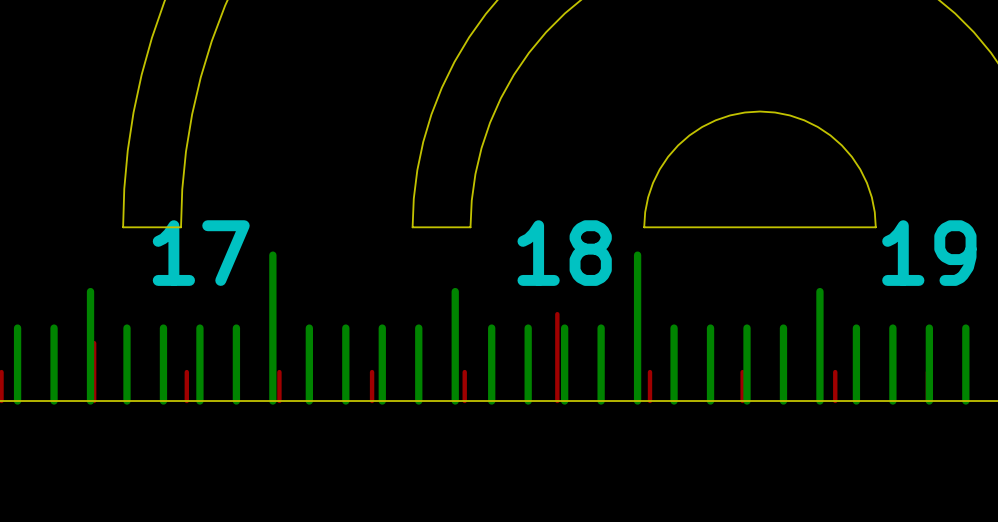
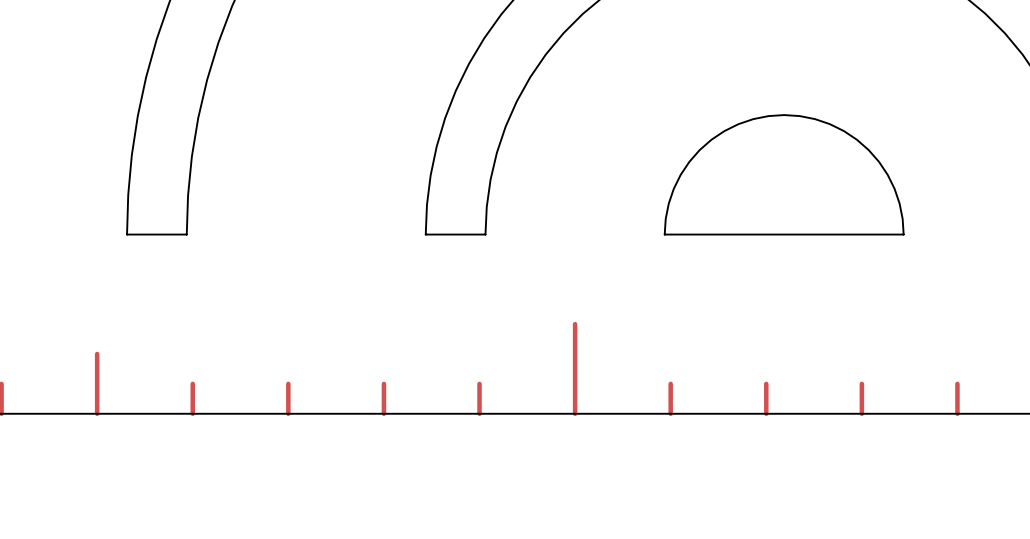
text: 17 (201, 253) -> none
text: 18 (564, 253) -> none
text: 19 (929, 253) -> none
bottom track: (272, 255) (272, 401) -> none
bottom track: (637, 255) (637, 401) -> none
bottom track: (90, 291) (90, 401) -> none
bottom track: (455, 291) (455, 401) -> none
bottom track: (819, 291) (819, 401) -> none
bottom track: (17, 328) (17, 401) -> none
bottom track: (54, 328) (54, 401) -> none
bottom track: (126, 328) (126, 401) -> none
bottom track: (163, 328) (163, 401) -> none
bottom track: (199, 328) (199, 401) -> none
bottom track: (236, 328) (236, 401) -> none
bottom track: (309, 328) (309, 401) -> none
bottom track: (345, 328) (345, 401) -> none
bottom track: (382, 328) (382, 401) -> none
bottom track: (418, 328) (418, 401) -> none
bottom track: (491, 328) (491, 401) -> none
bottom track: (528, 328) (528, 401) -> none
bottom track: (564, 328) (564, 401) -> none
bottom track: (601, 328) (601, 401) -> none
bottom track: (674, 328) (674, 401) -> none
bottom track: (710, 328) (710, 401) -> none
bottom track: (747, 328) (747, 401) -> none
bottom track: (783, 328) (783, 401) -> none
bottom track: (856, 328) (856, 401) -> none
bottom track: (892, 328) (892, 401) -> none
bottom track: (929, 328) (929, 401) -> none
bottom track: (965, 328) (965, 401) -> none

